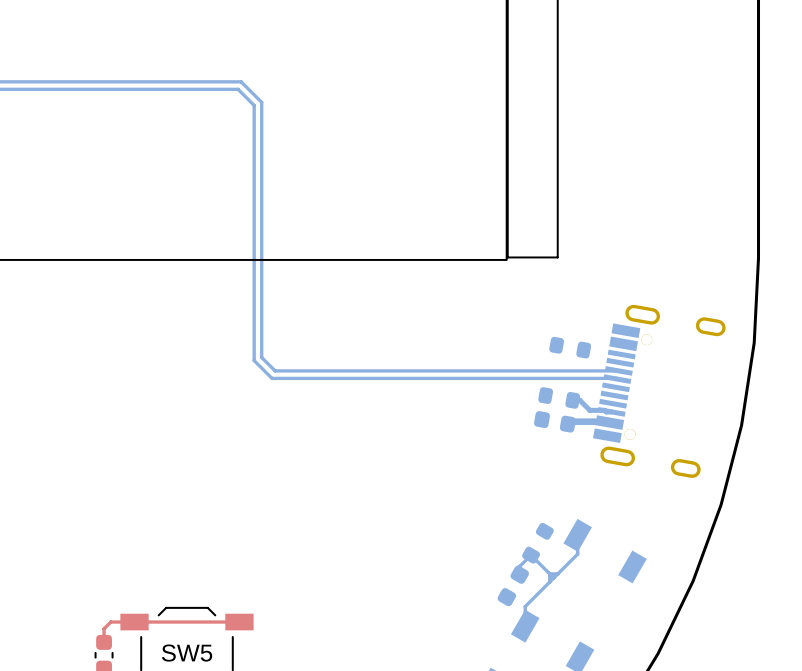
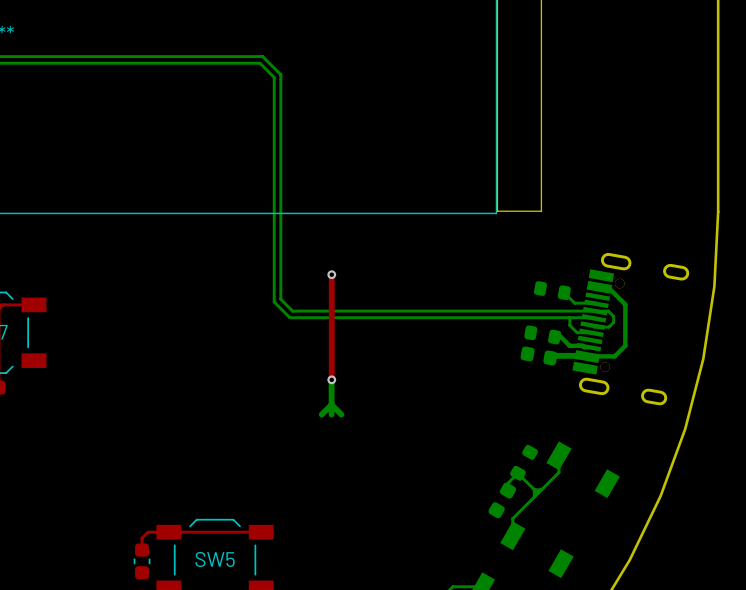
top track: none -> (331, 274) (331, 379)
via: none -> (331, 274)
bottom track: none -> (599, 287) (608, 287) (625, 304) (625, 345) (614, 356) (587, 356)
bottom track: none -> (564, 292) (574, 303) (596, 303)
bottom track: none -> (595, 311) (608, 311) (613, 316) (613, 322) (609, 327) (592, 325)
bottom track: none -> (569, 317) (569, 325) (577, 332) (591, 332)
via: none -> (331, 379)
bottom track: none -> (331, 379) (331, 414)
bottom track: none -> (321, 414) (331, 404) (341, 414)

